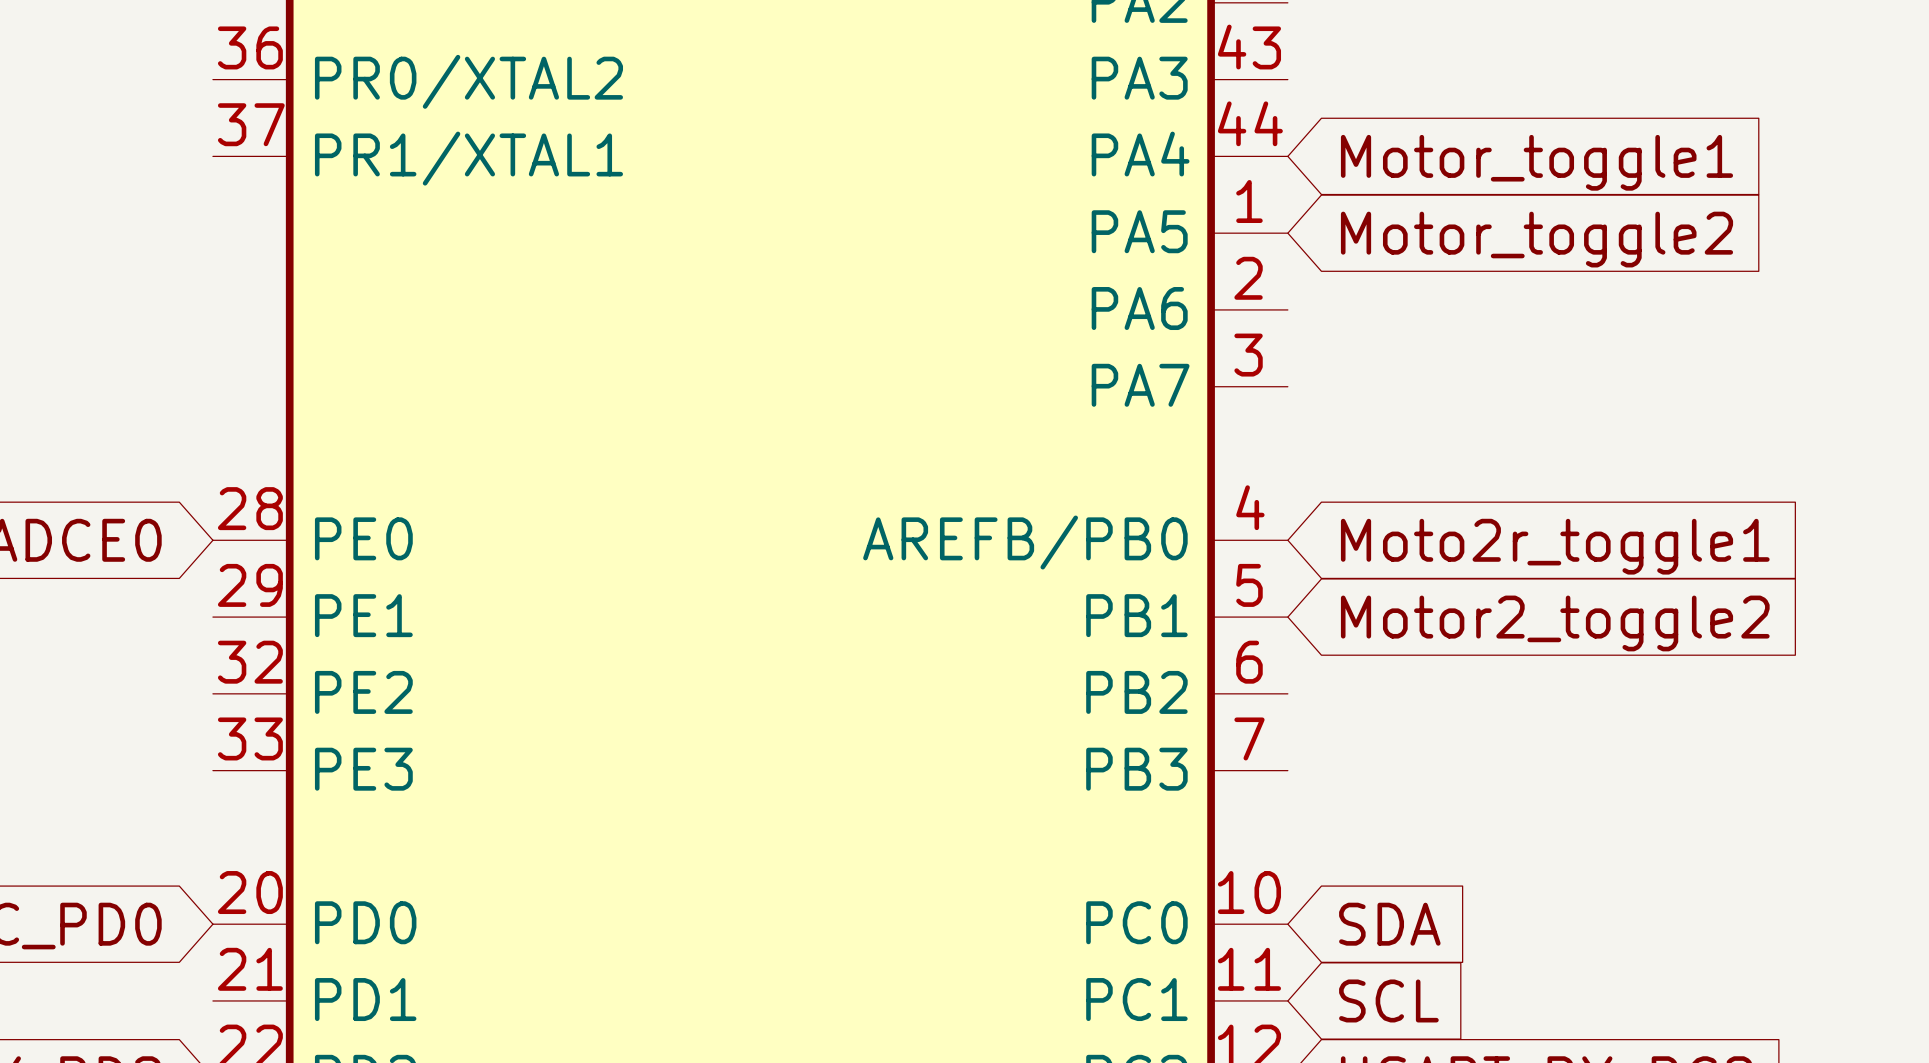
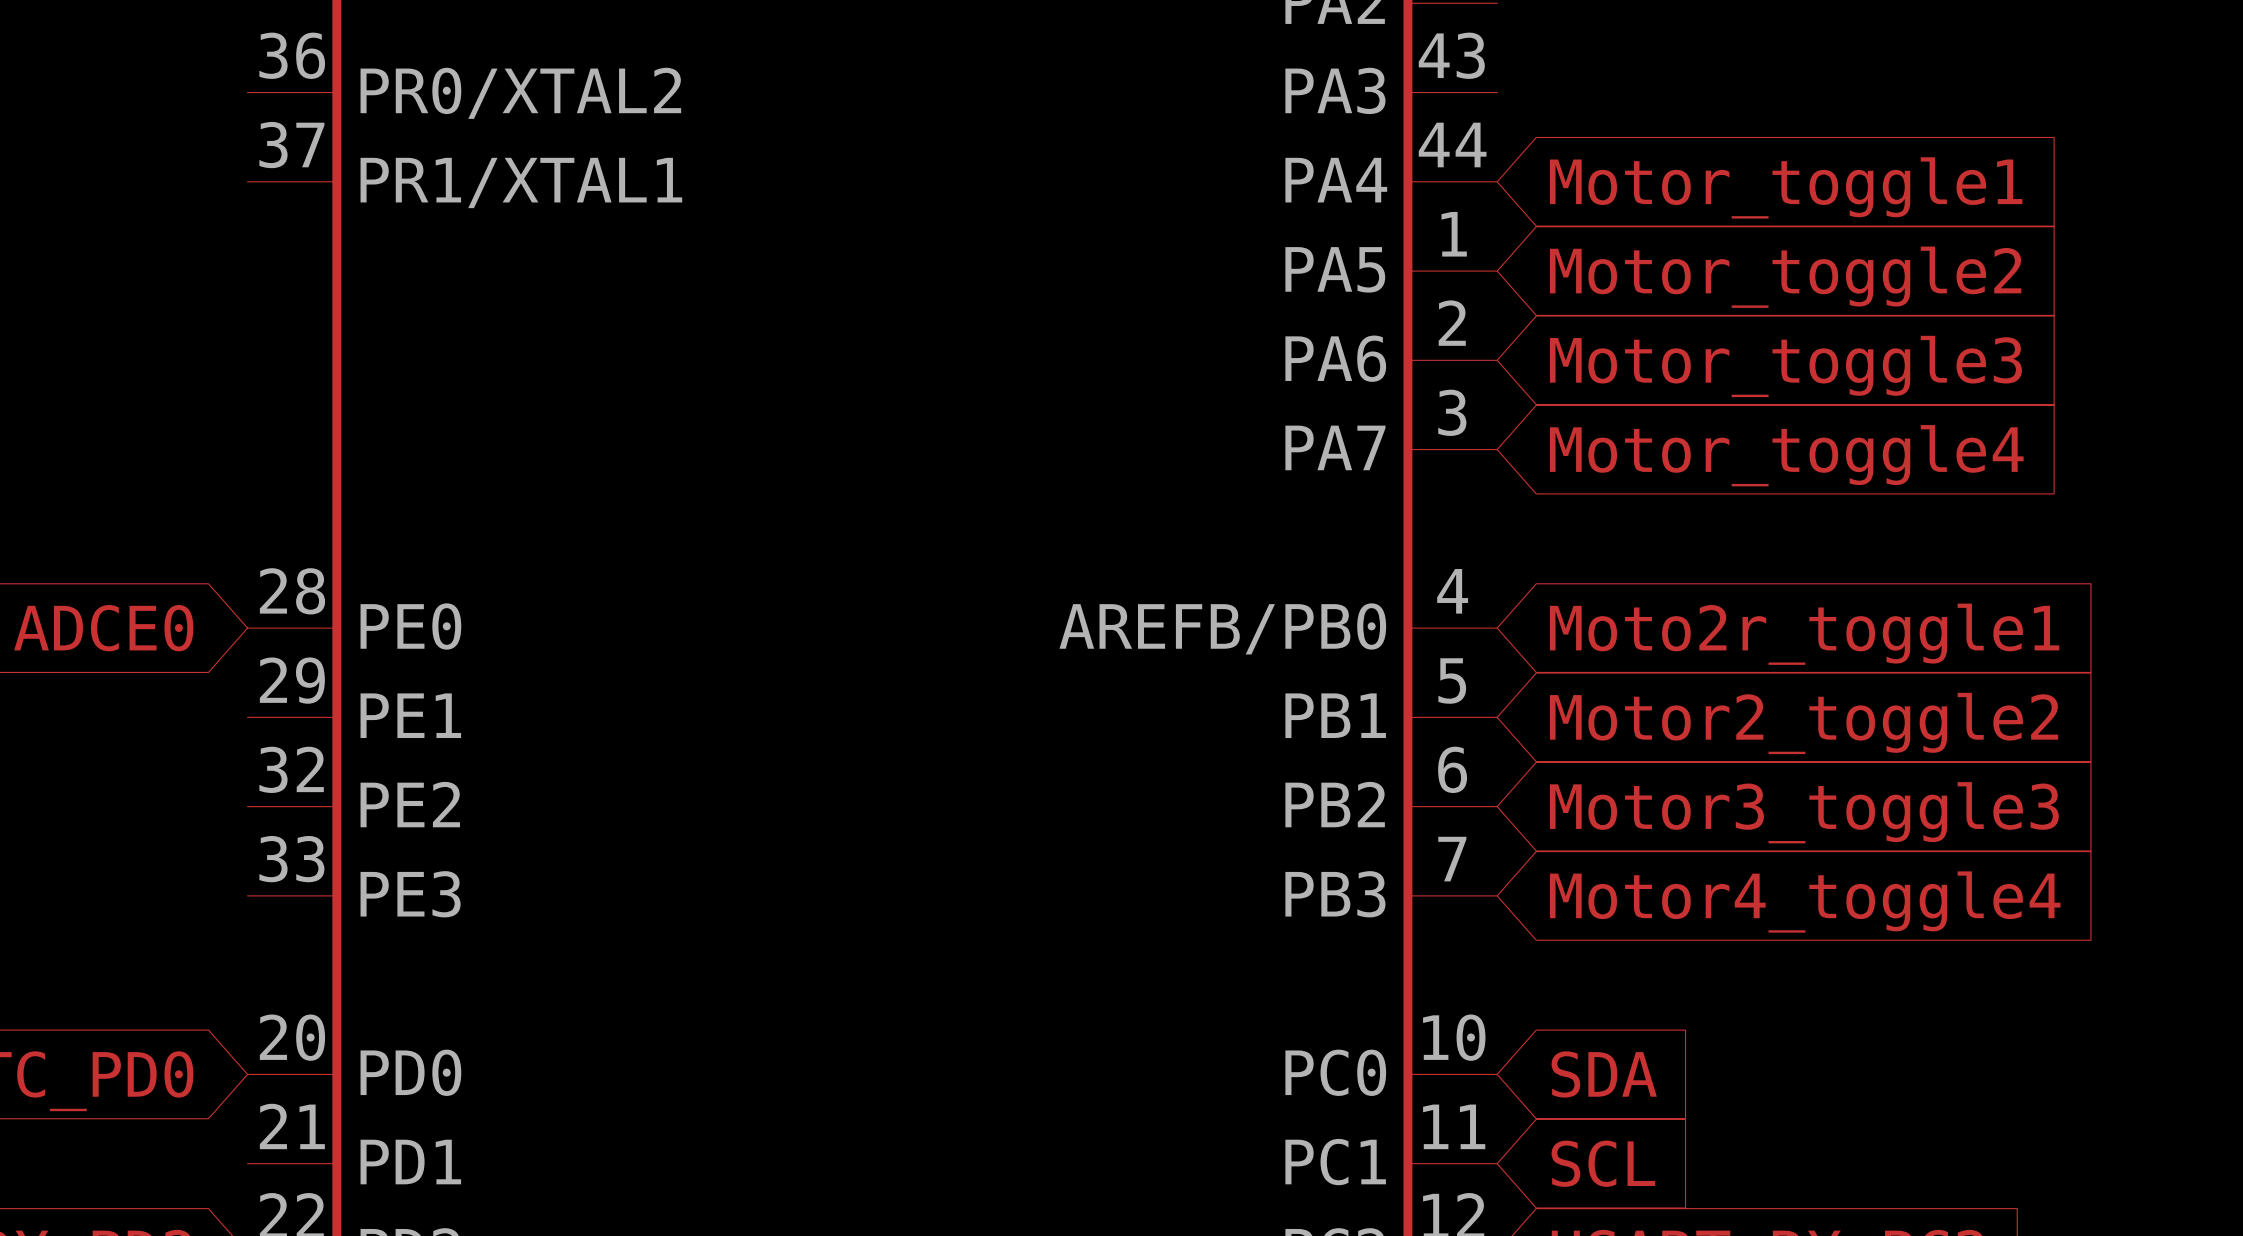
global label: none -> Motor_toggle3 (1785, 366)
global label: none -> Motor_toggle4 (1786, 455)
global label: none -> Motor3_toggle3 (1804, 812)
global label: none -> Motor4_toggle4 (1805, 902)

